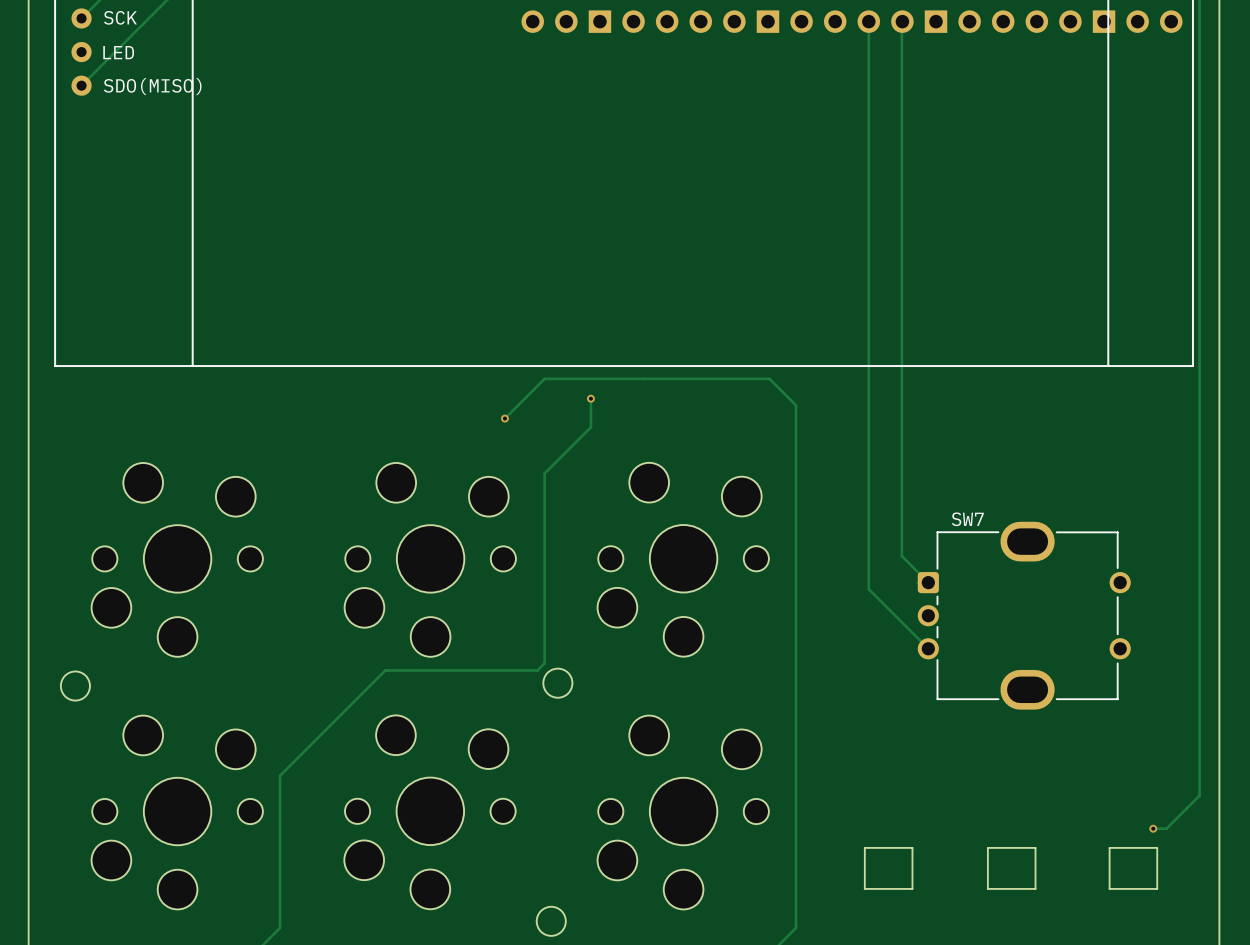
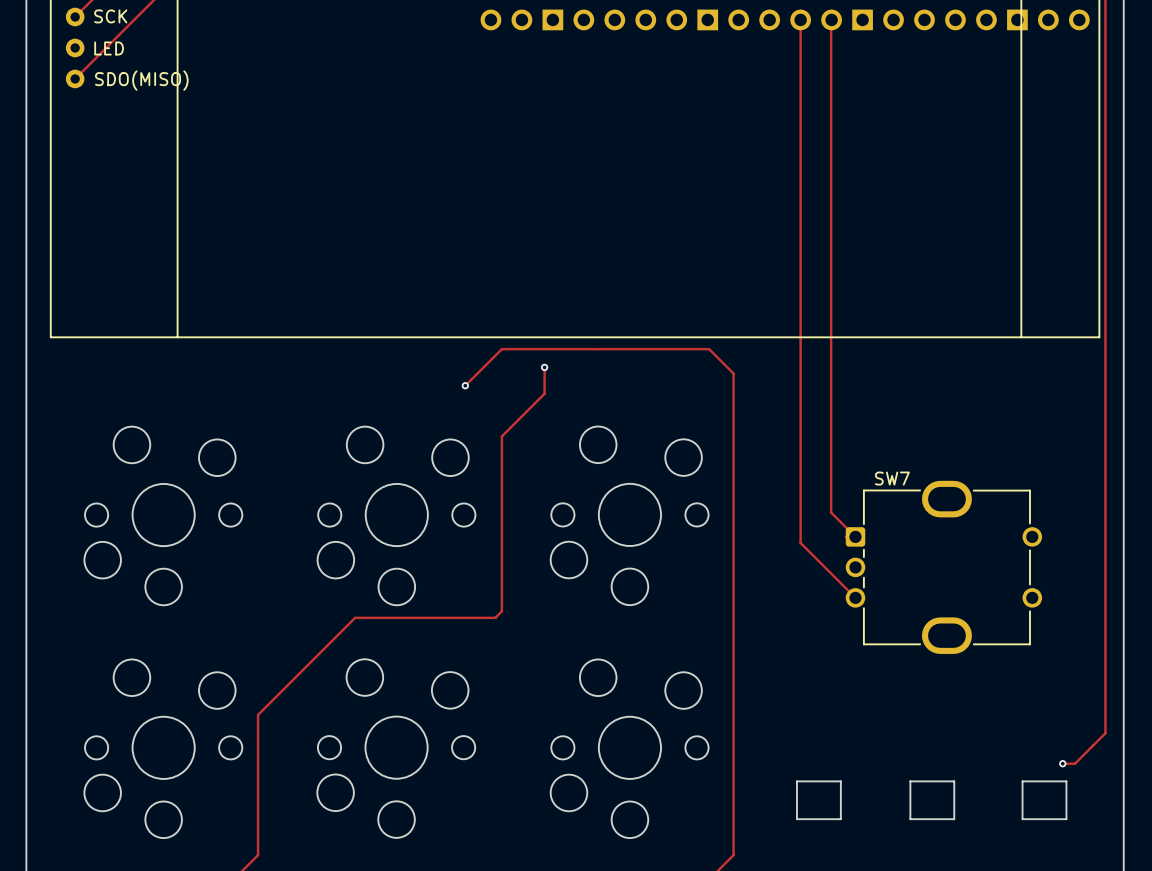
drawing: [543, 668, 573, 698] -> none
drawing: [60, 671, 91, 701] -> none
drawing: [536, 906, 566, 936] -> none

